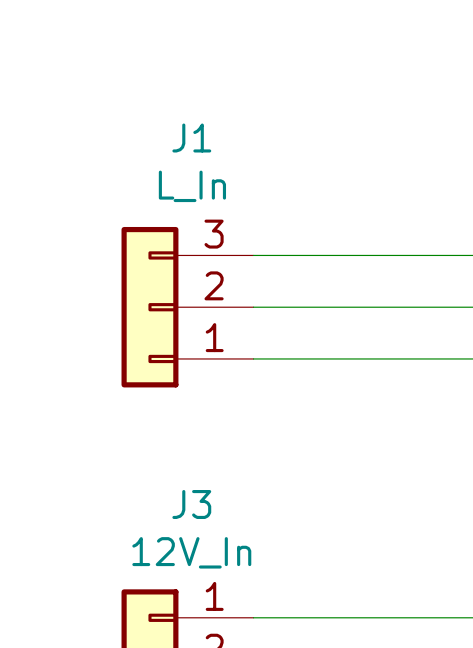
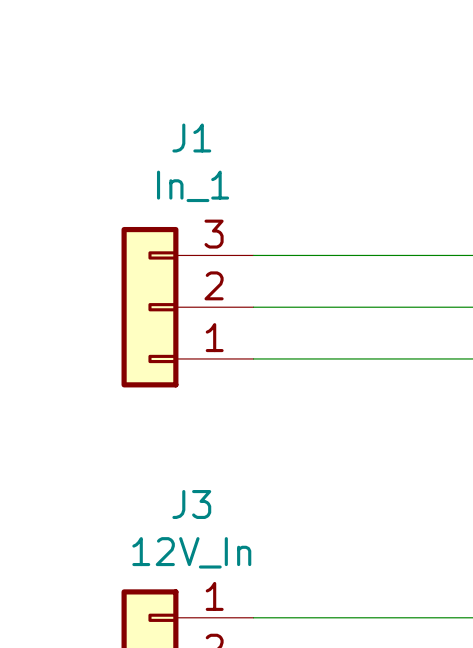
J1 value: L_In (192, 186) -> In_1 (193, 186)

